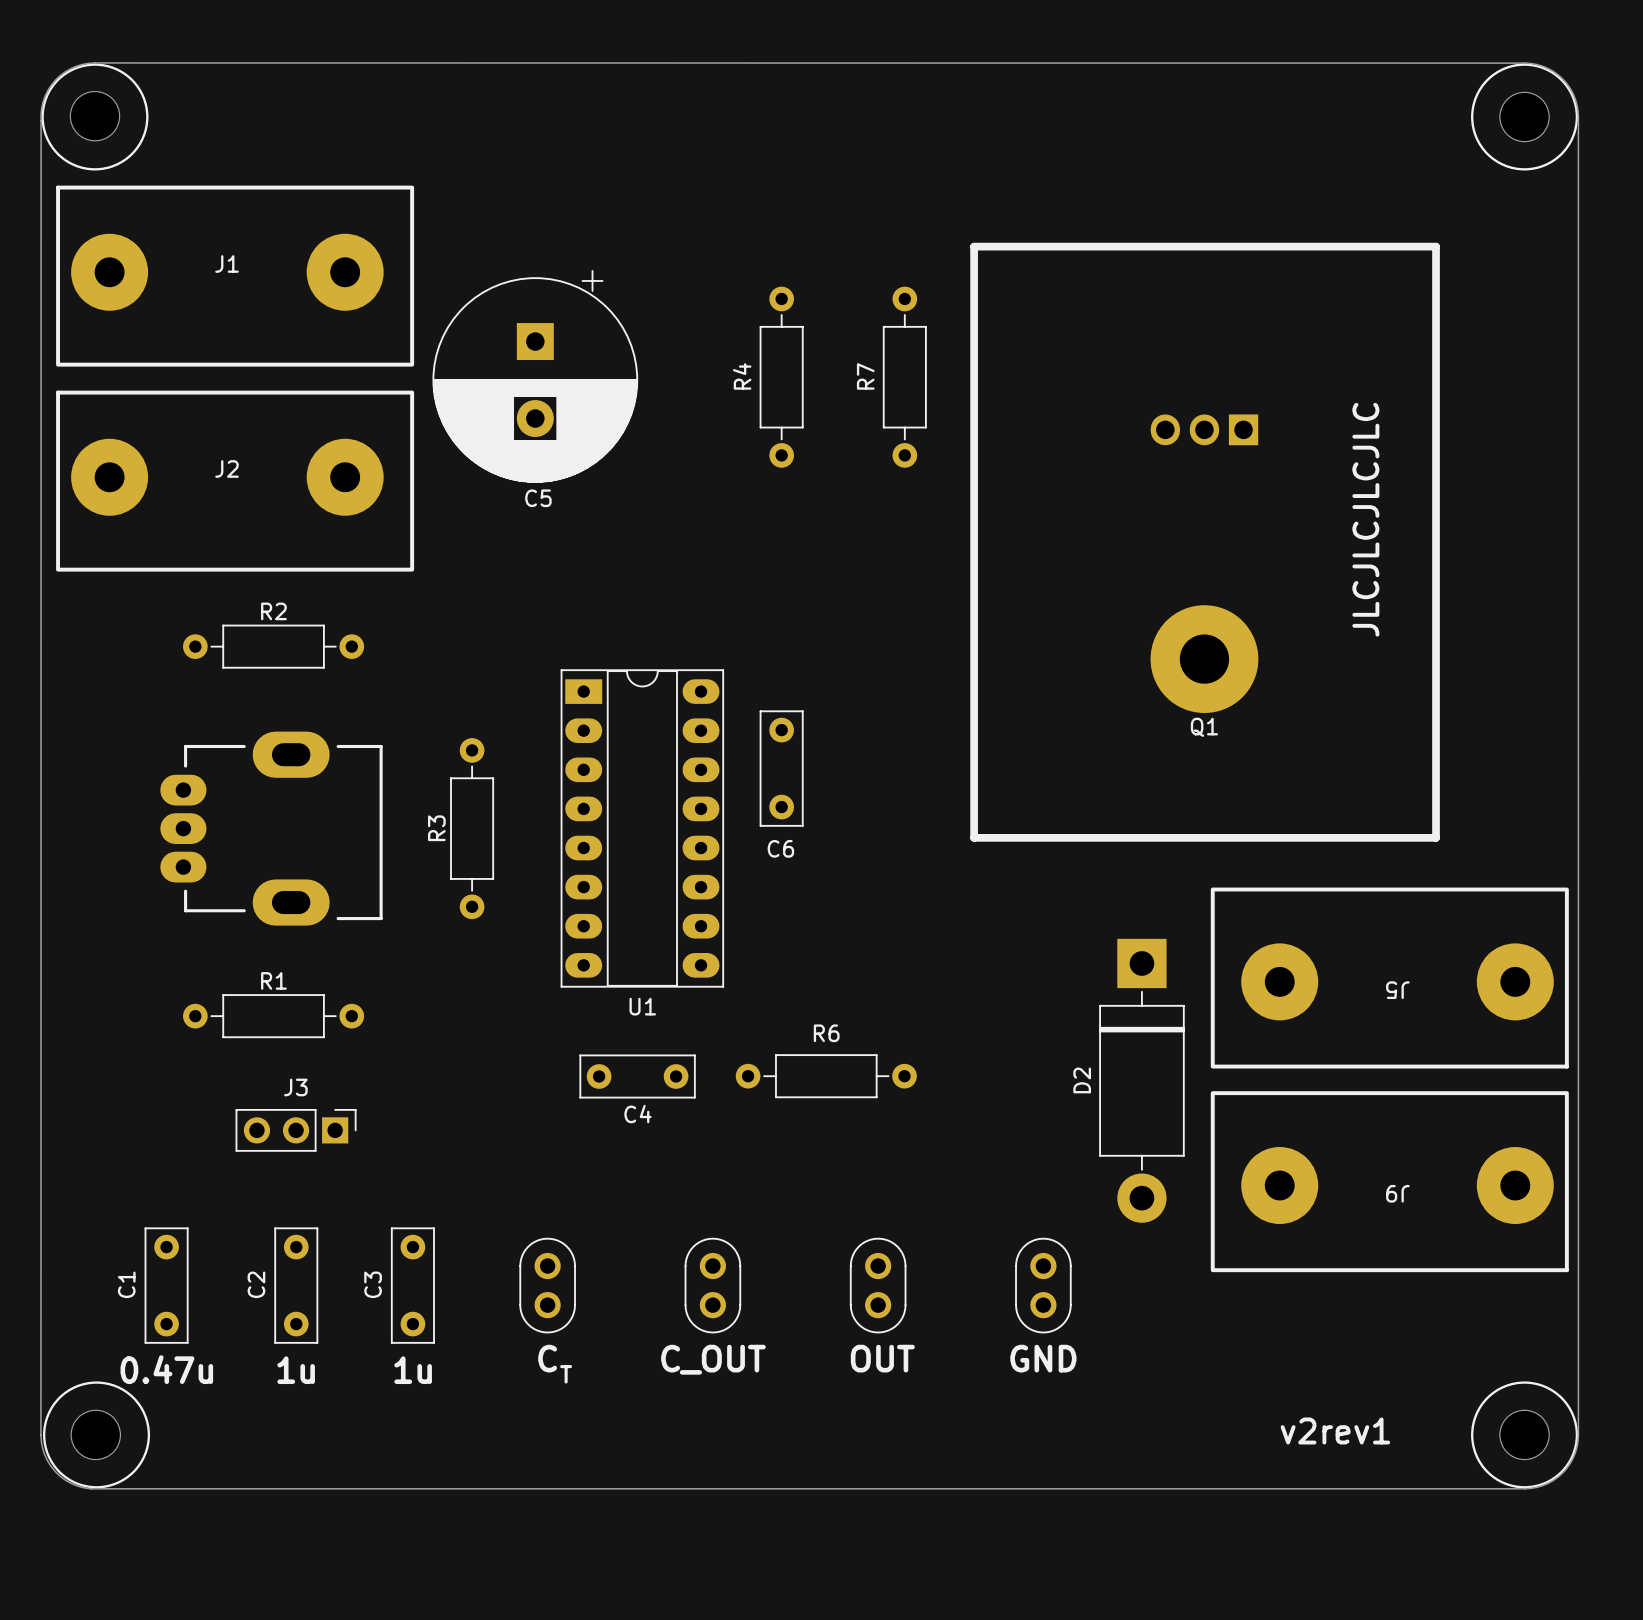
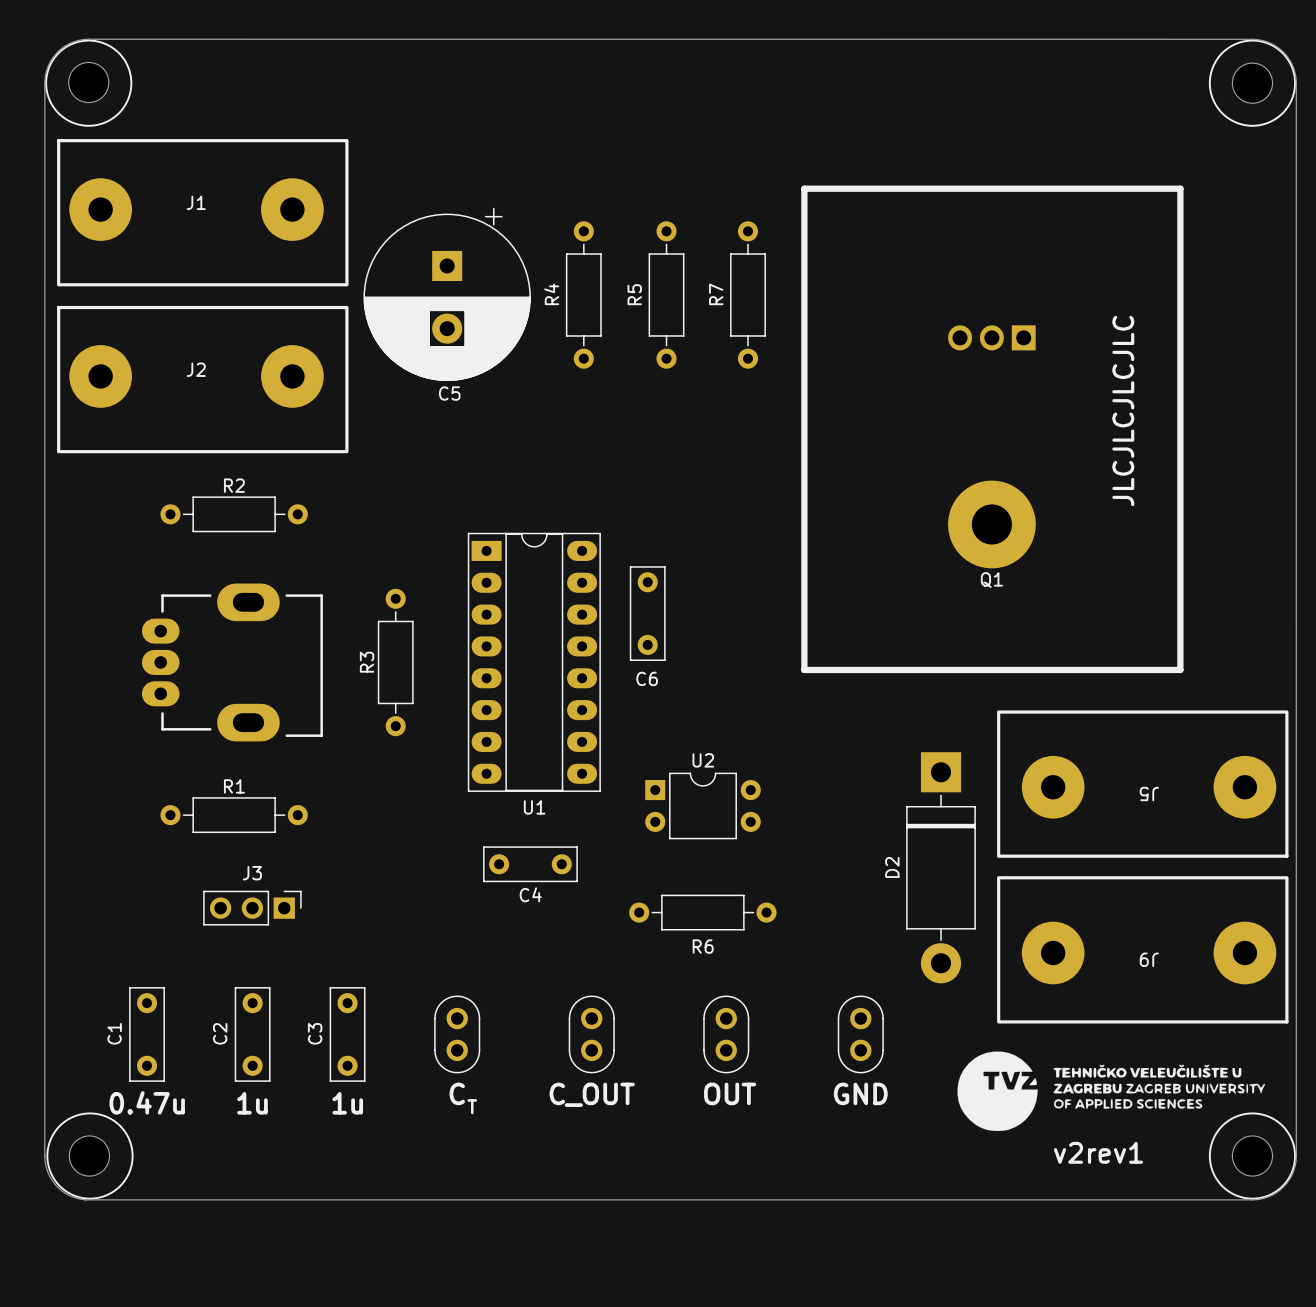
R4 position: (781, 377) -> (583, 294)
R5: none -> (666, 294)
U2: none -> (703, 805)
R6 name position: R6 (826, 1033) -> R6 (703, 946)
R6 position: (826, 1076) -> (702, 912)
drawing: none -> [957, 1051, 1265, 1132]

